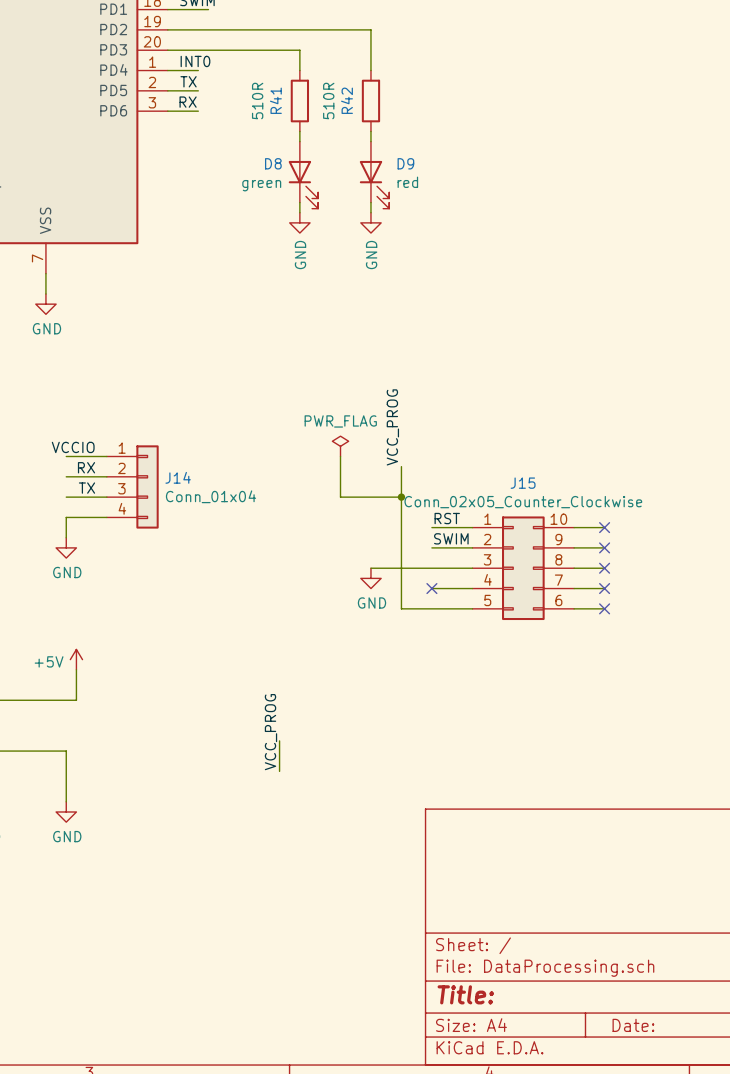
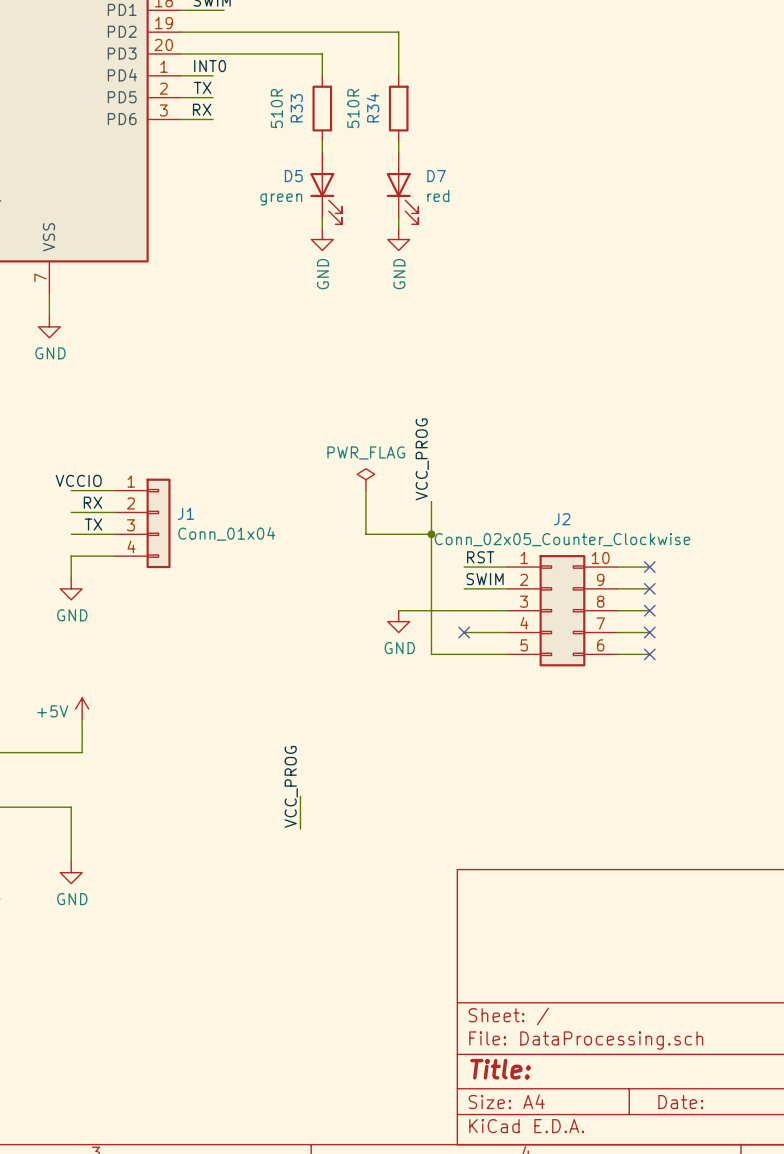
R41 name: R41 (275, 100) -> R33 (296, 108)
R42 name: R42 (346, 100) -> R34 (372, 108)
D8 name: D8 (273, 163) -> D5 (293, 176)
D9 name: D9 (405, 163) -> D7 (436, 176)
J14 name: J14 (178, 477) -> J1 (185, 513)
J15 name: J15 (523, 483) -> J2 (562, 519)

